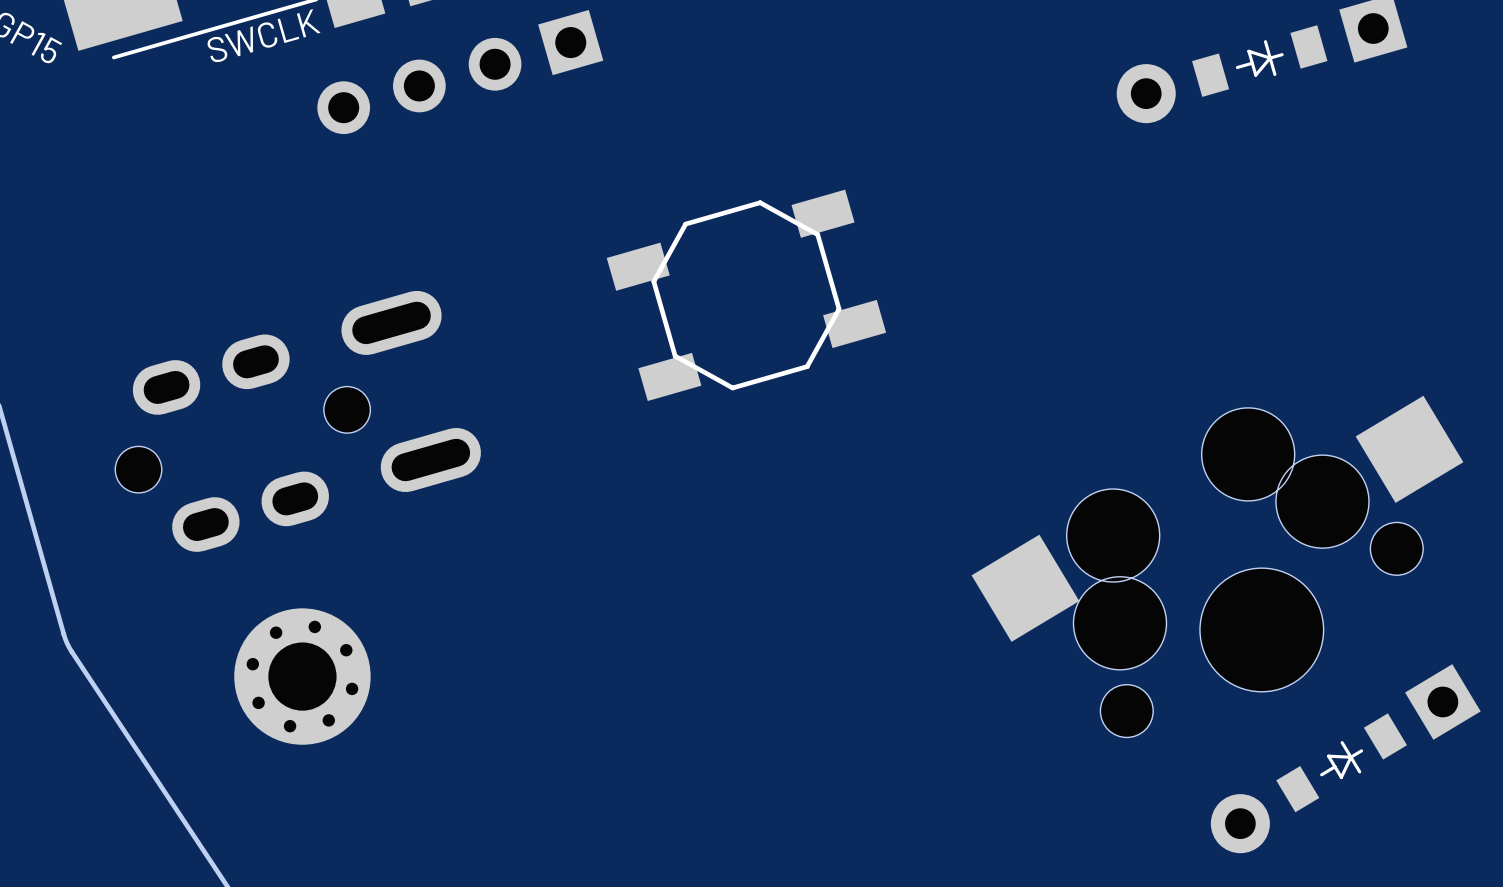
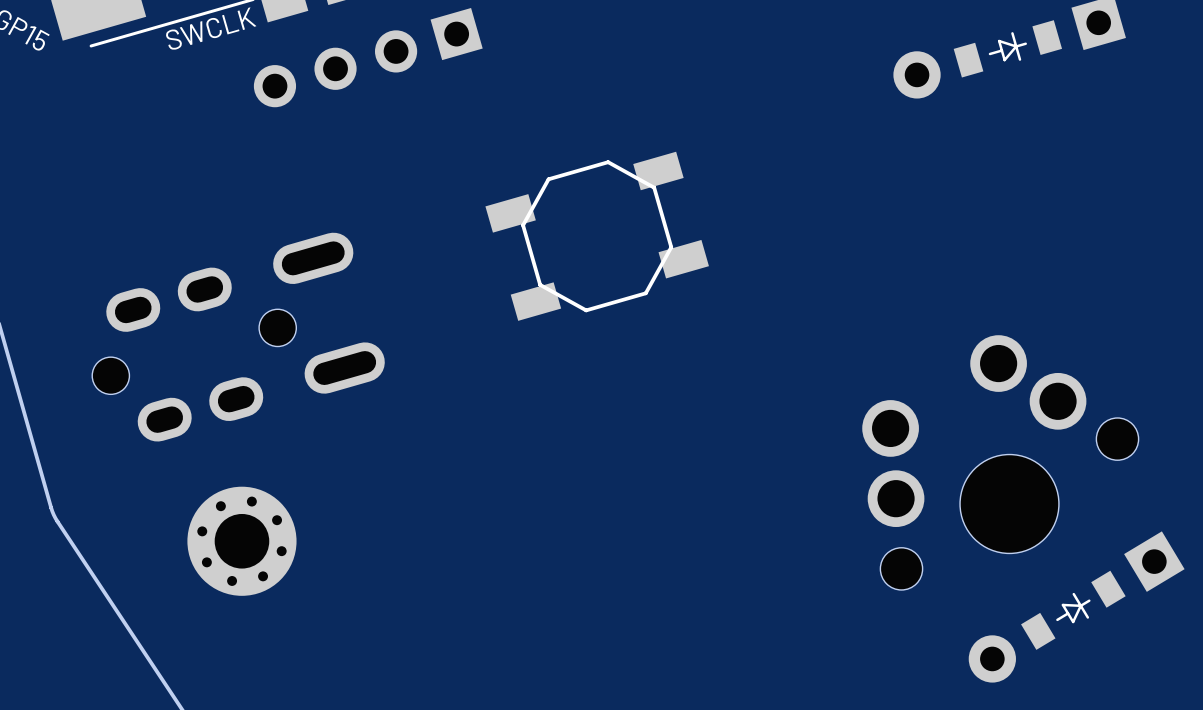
part: (1217, 566) -> none
part: none -> (1000, 462)

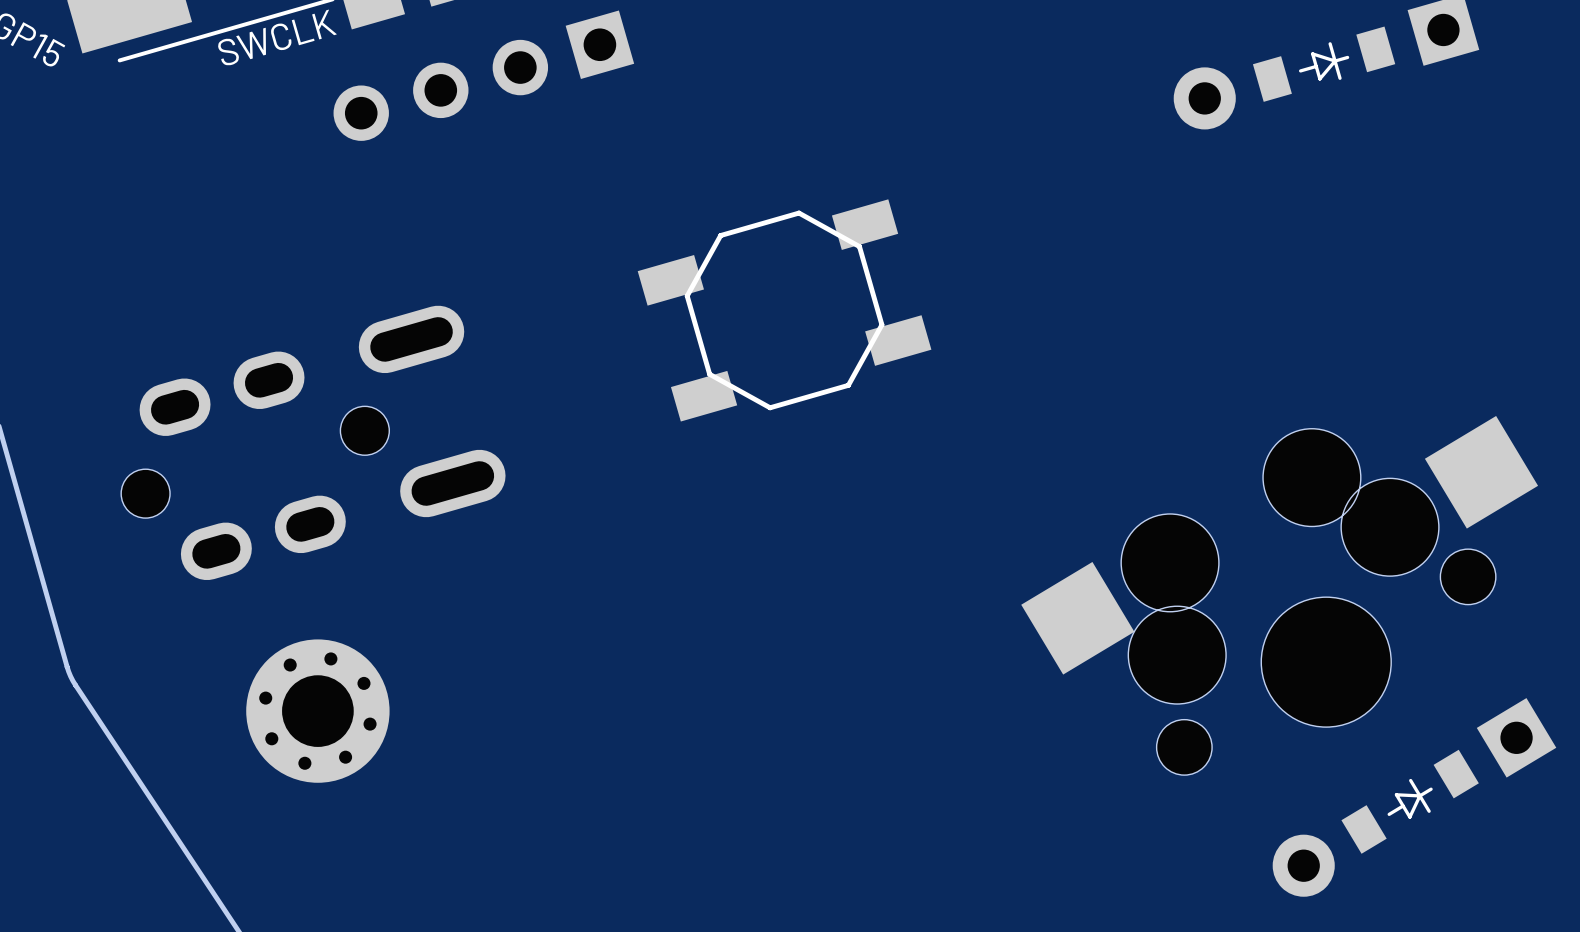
part: none -> (1279, 595)
part: (1000, 462) -> none

